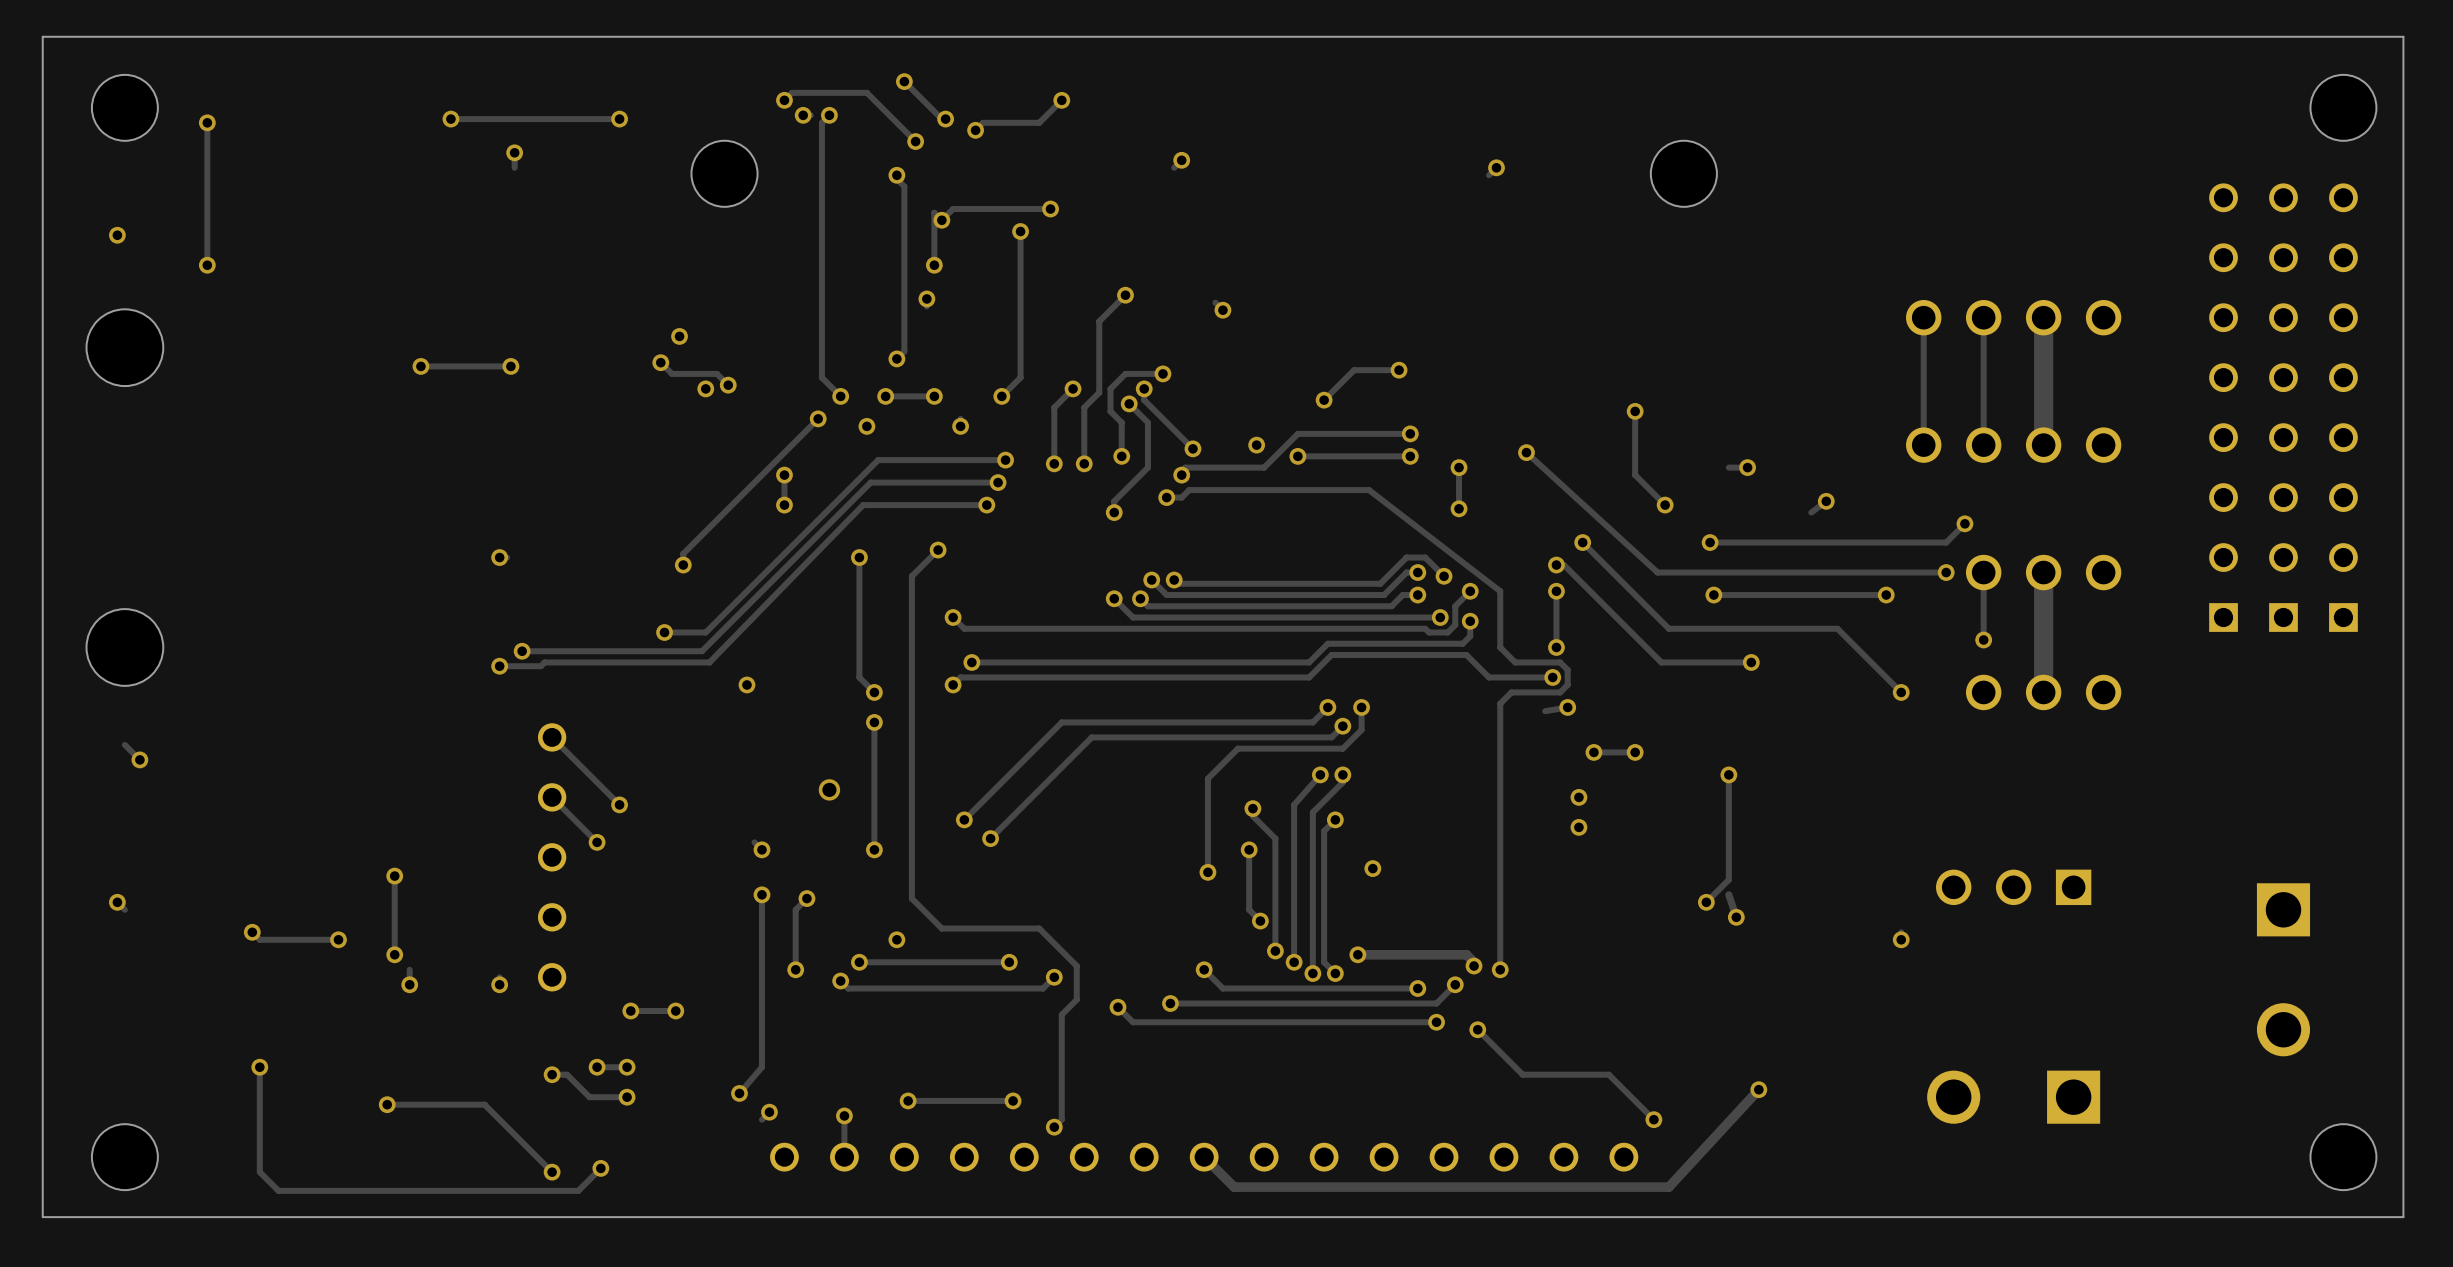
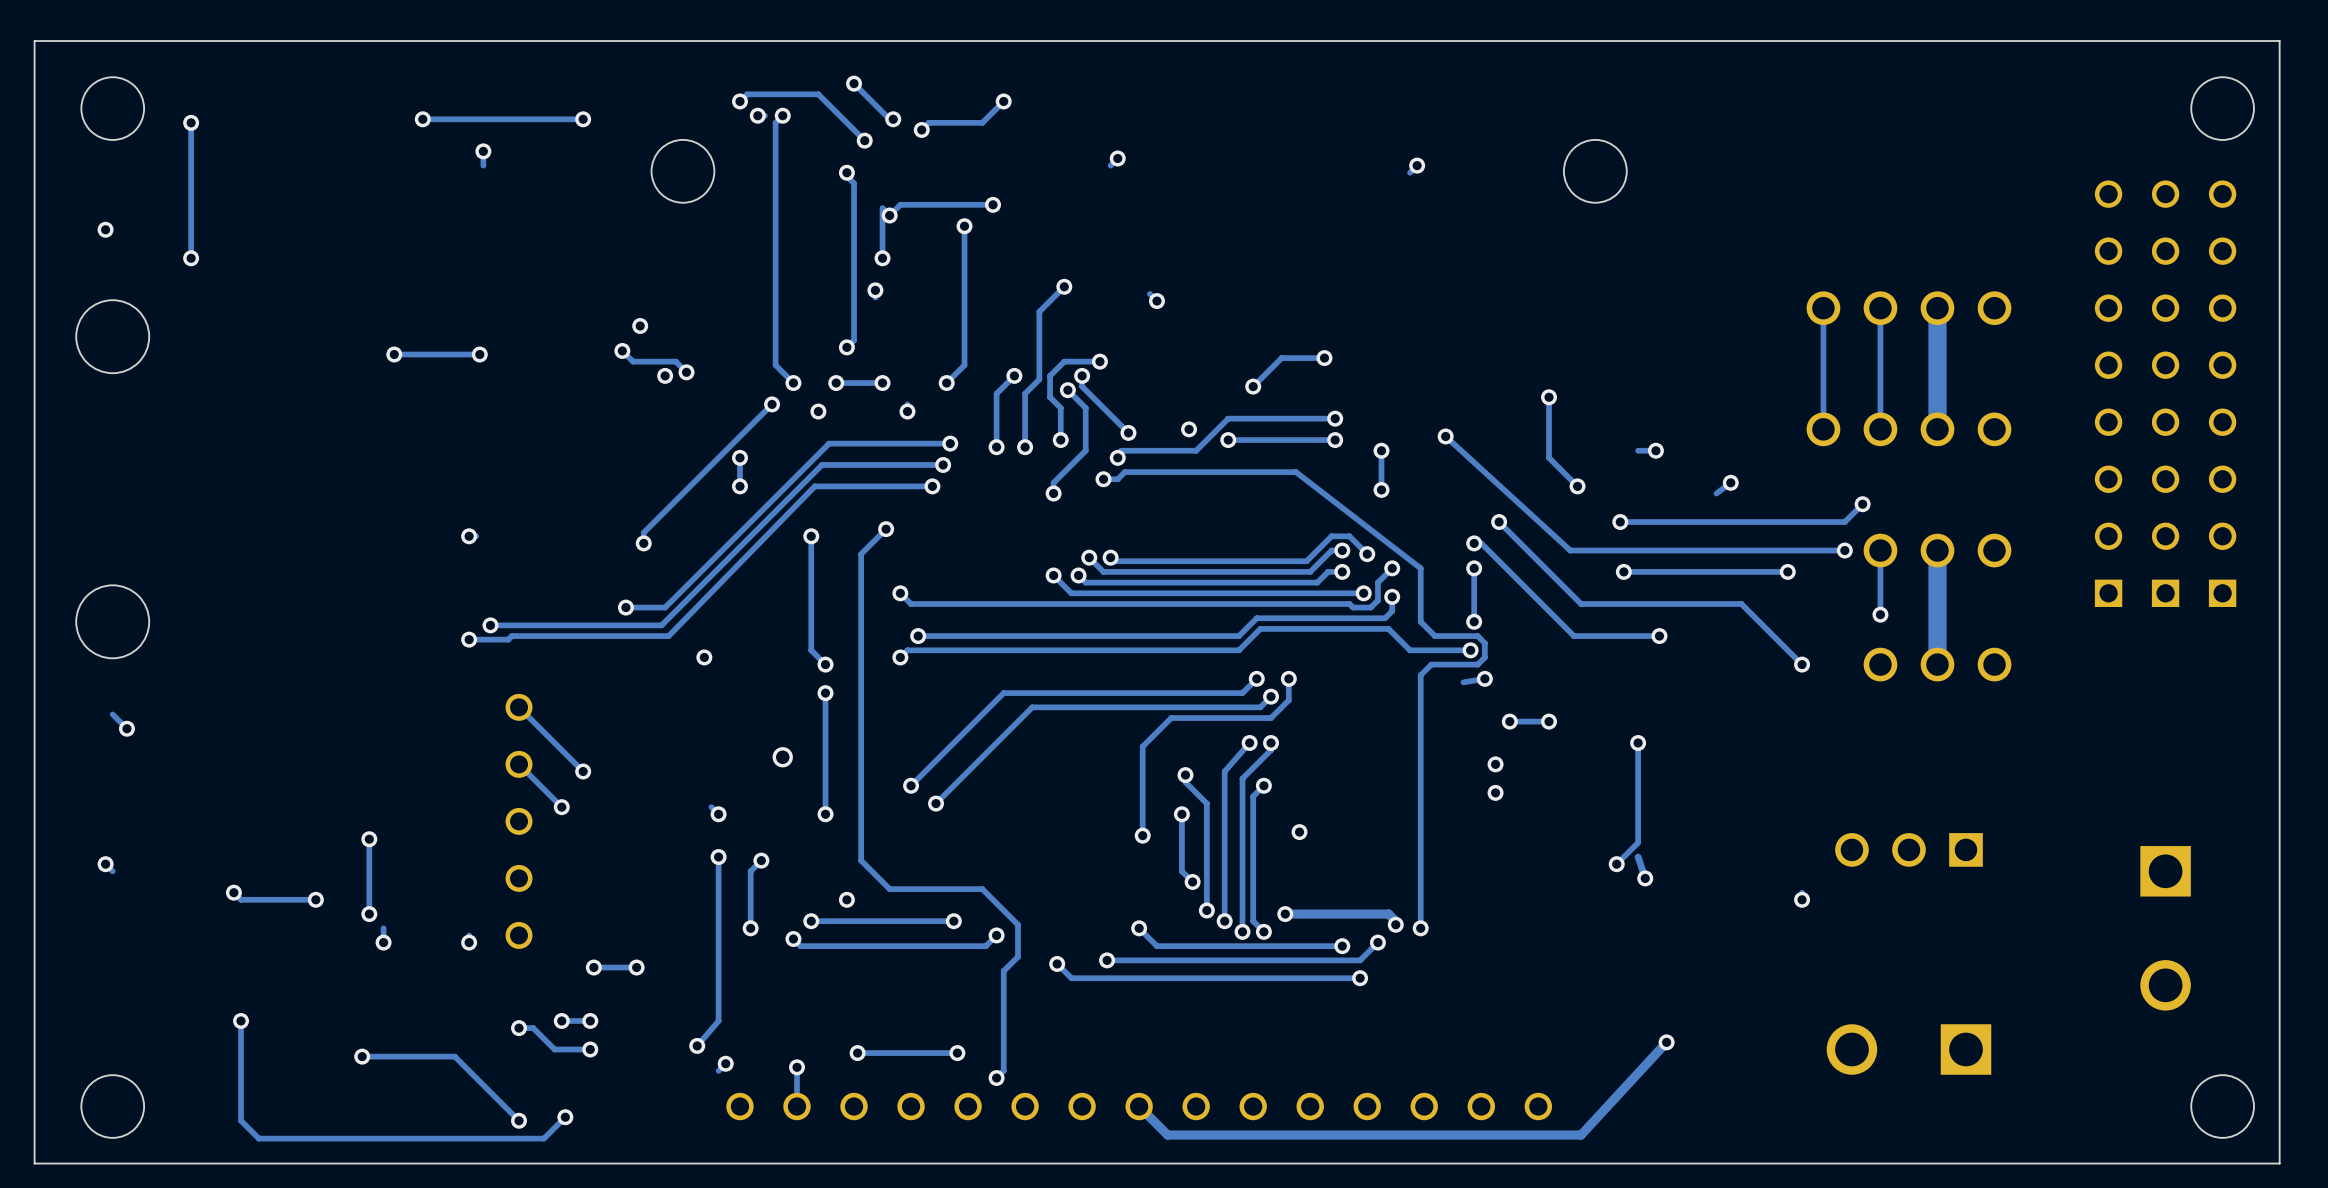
track: (1477, 1029) (1522, 1074) (1608, 1074) (1653, 1119) -> none
via: (1477, 1029) -> none
via: (1653, 1119) -> none

